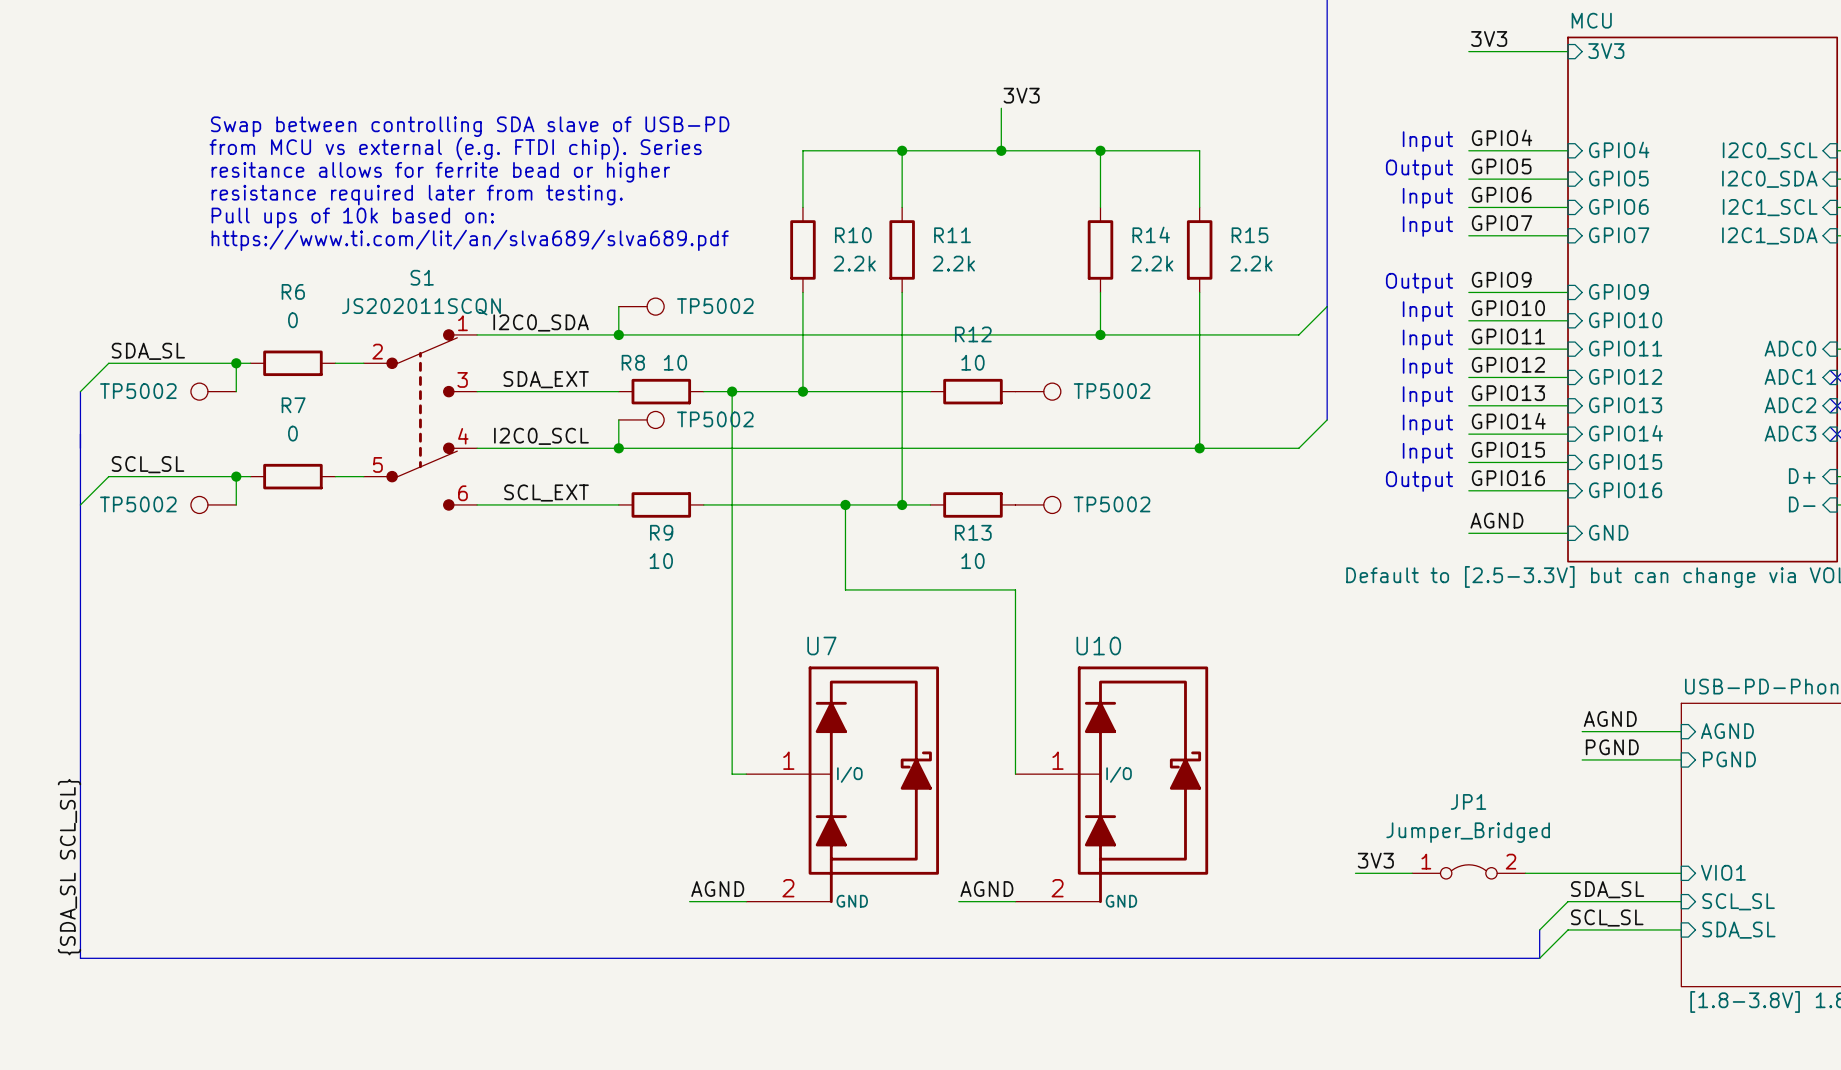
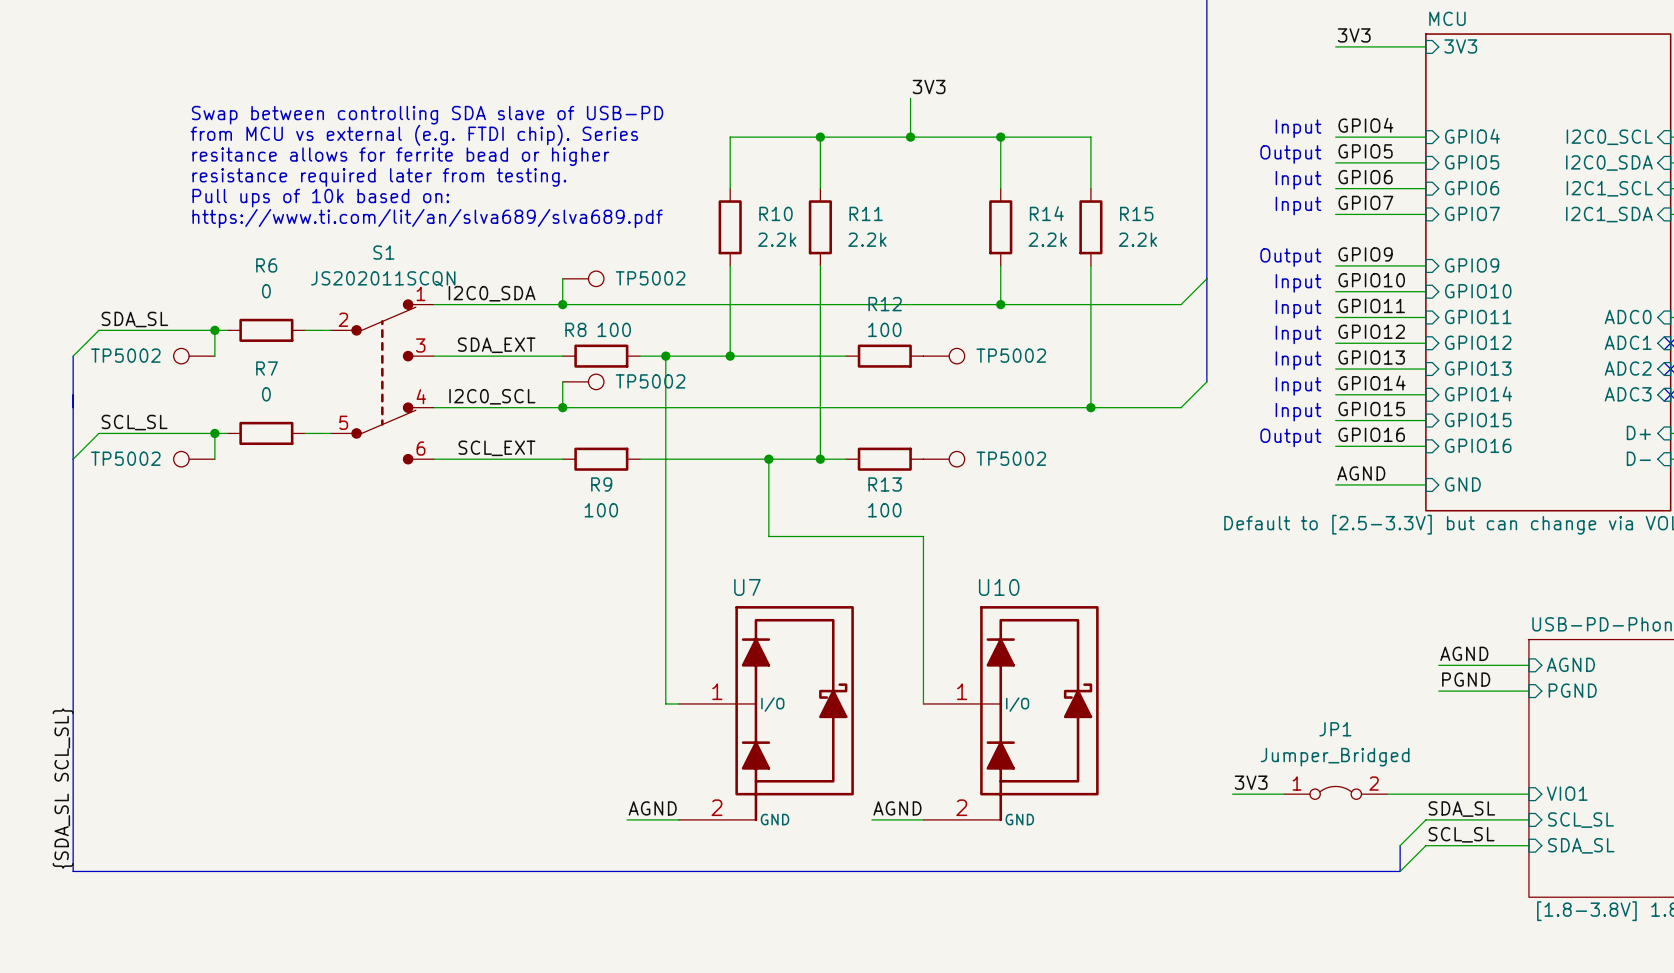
R8 value: 10 (675, 362) -> 100 (614, 329)
R12 value: 10 (972, 362) -> 100 (884, 329)
R9 value: 10 (661, 561) -> 100 (601, 510)
R13 value: 10 (972, 561) -> 100 (884, 510)

